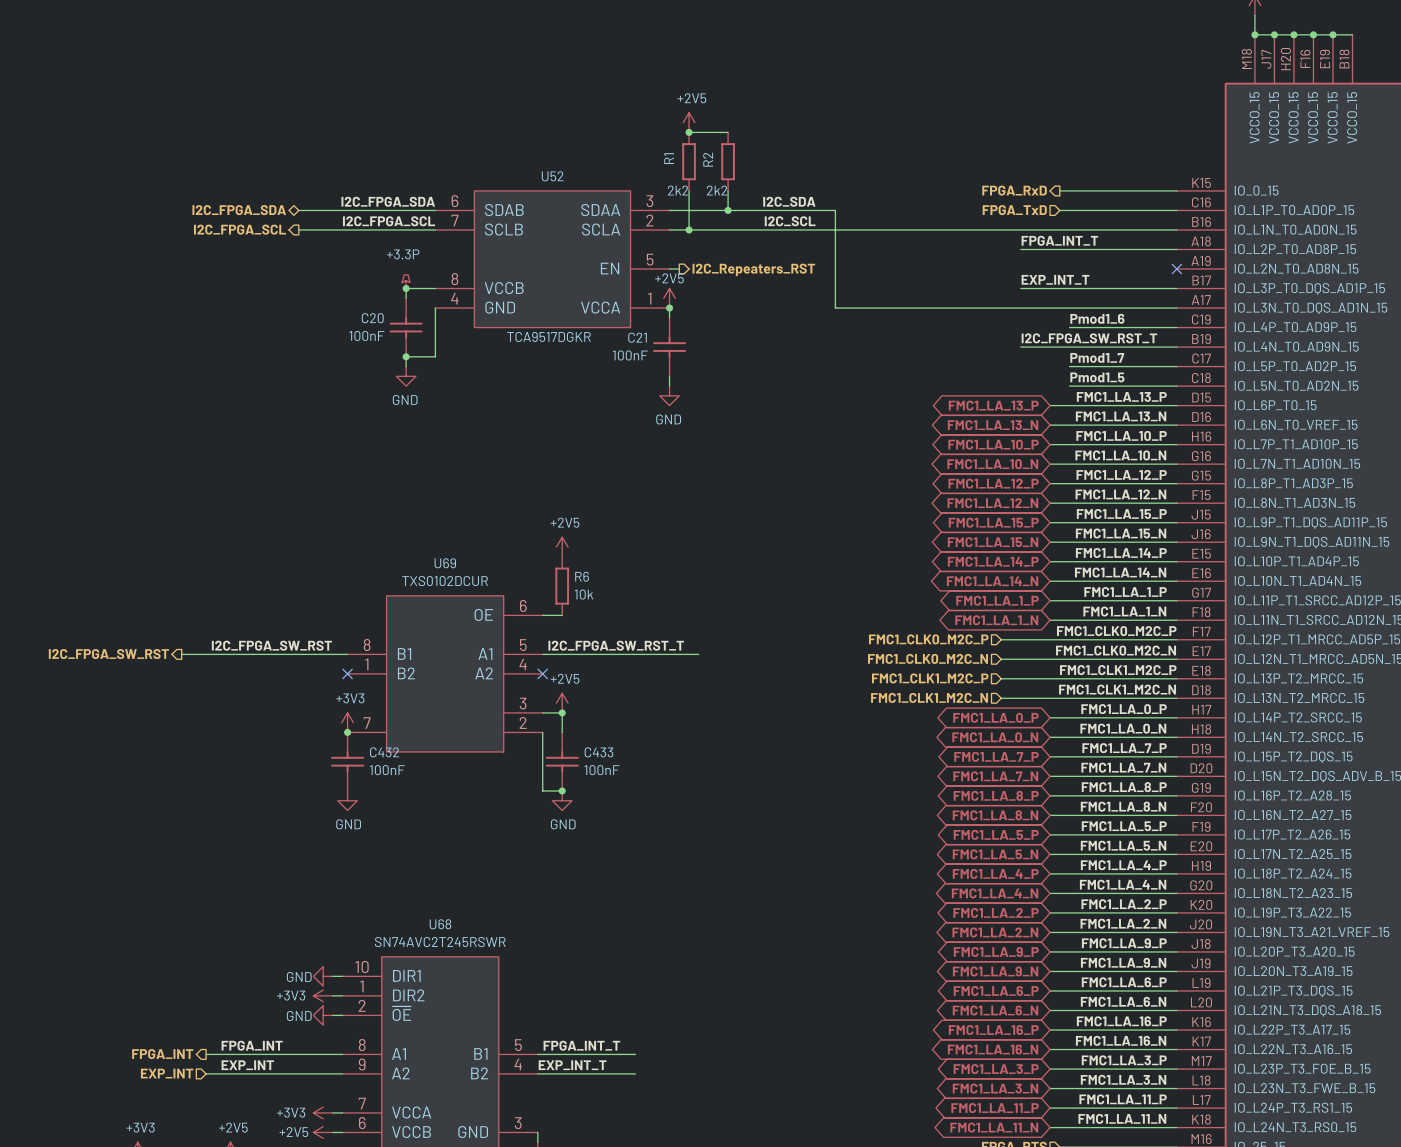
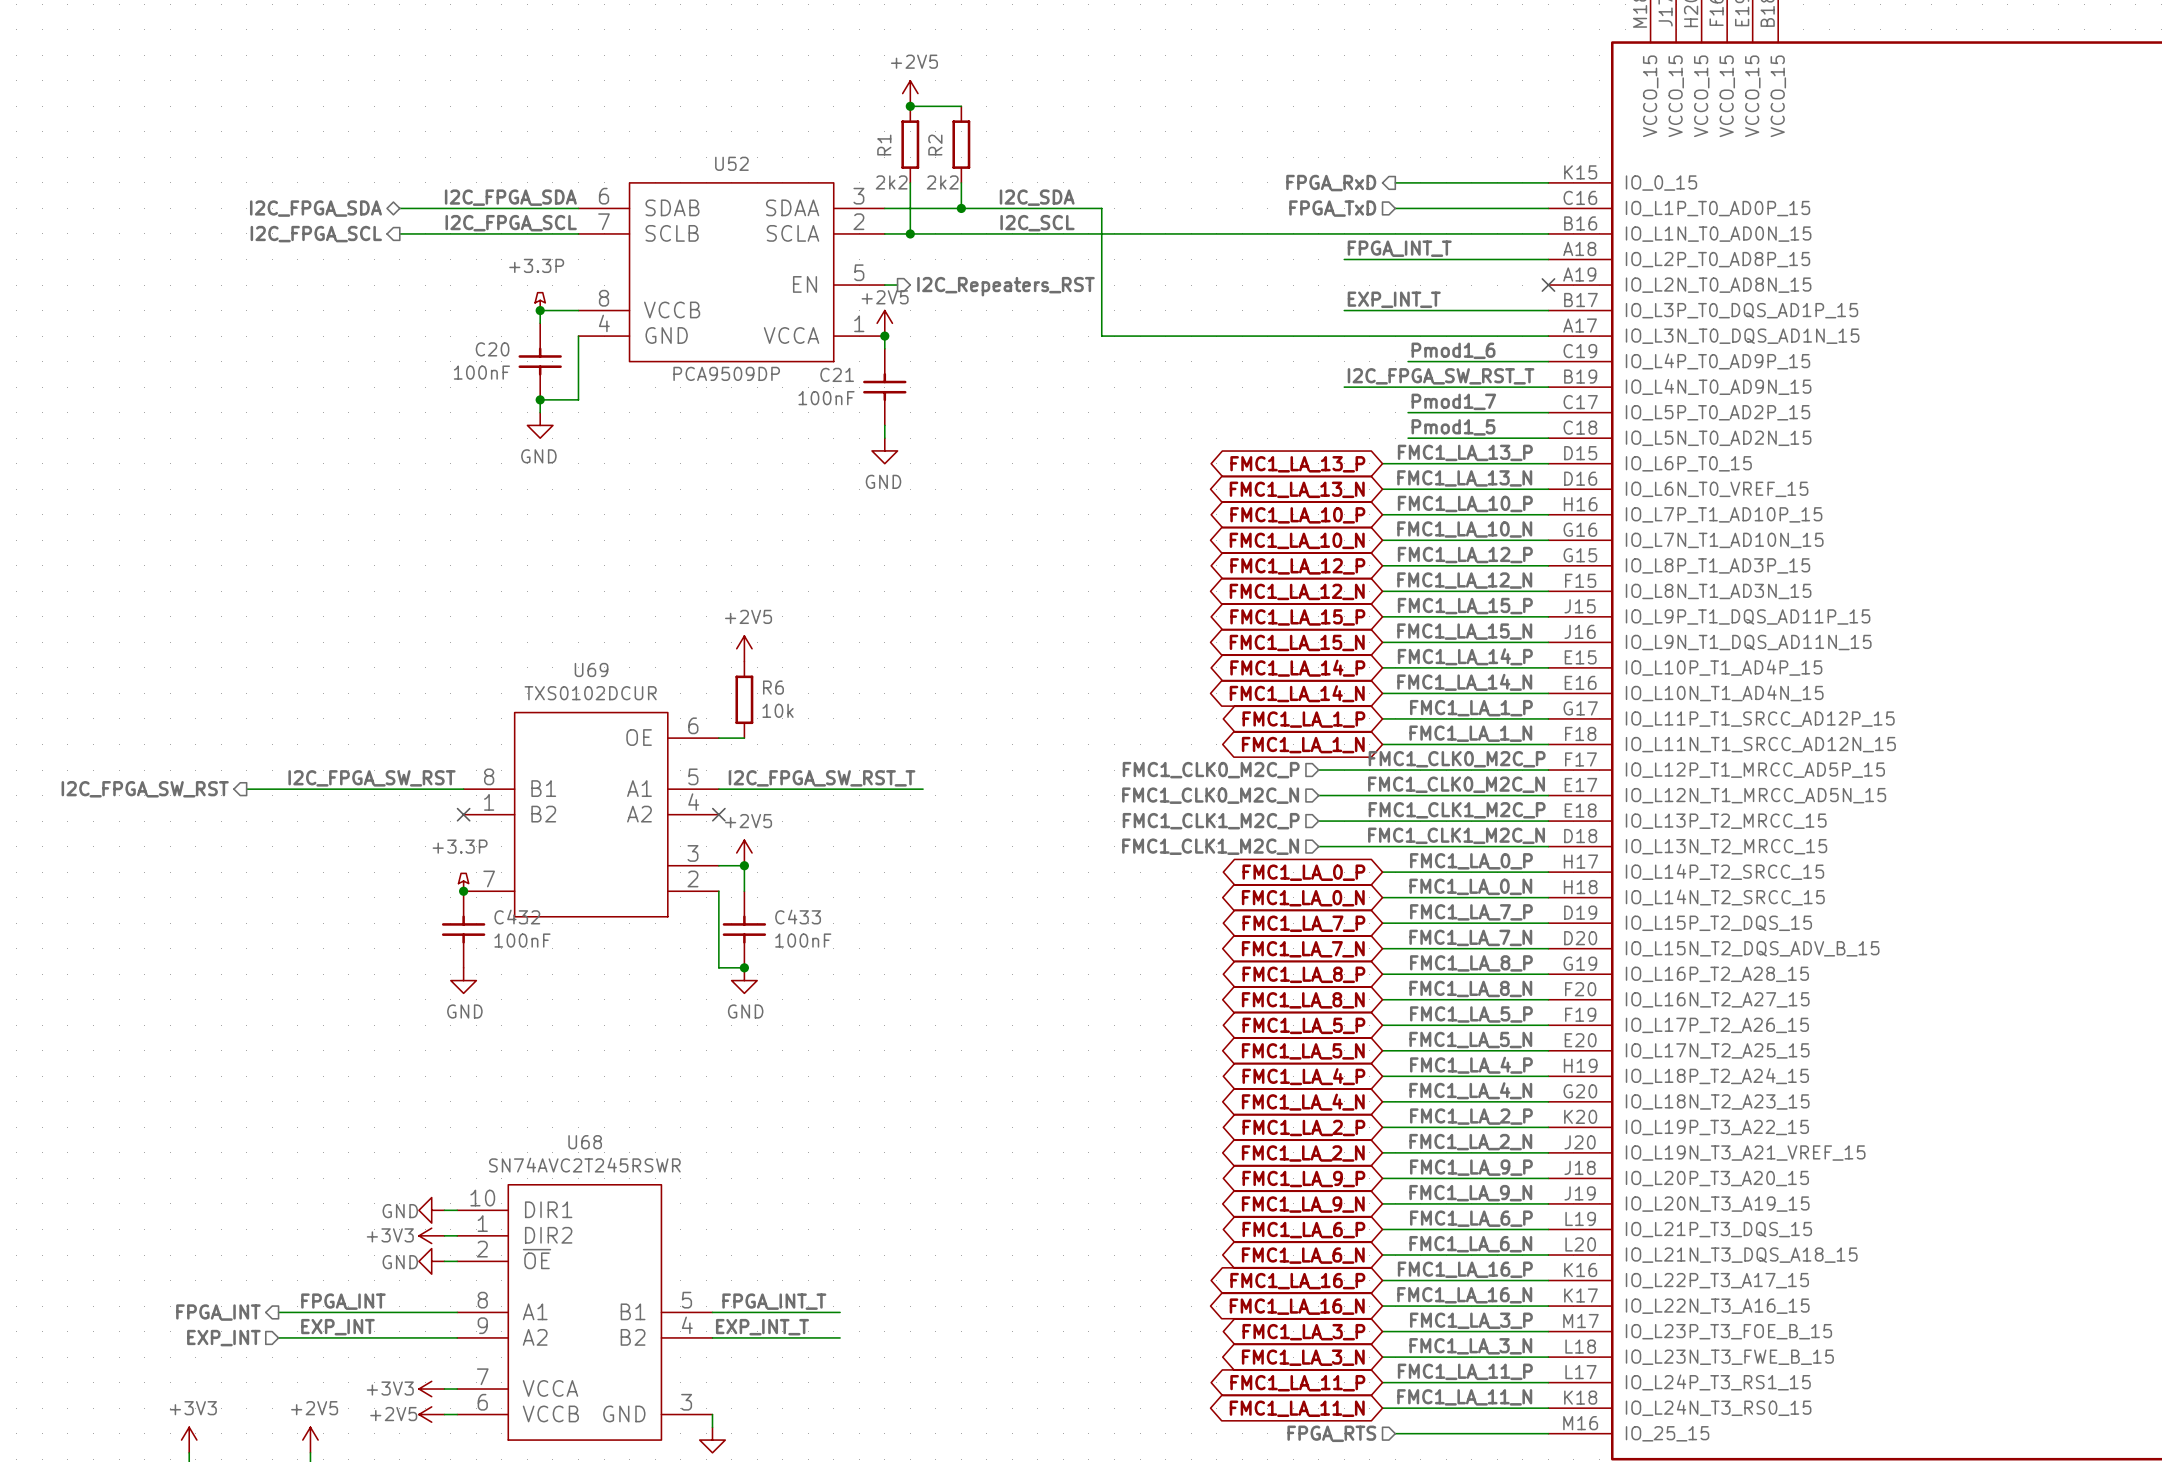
U52 value: TCA9517DGKR (548, 336) -> PCA9509DP (726, 373)
power symbol: +3V3 (347, 722) -> +3.3P (463, 882)

